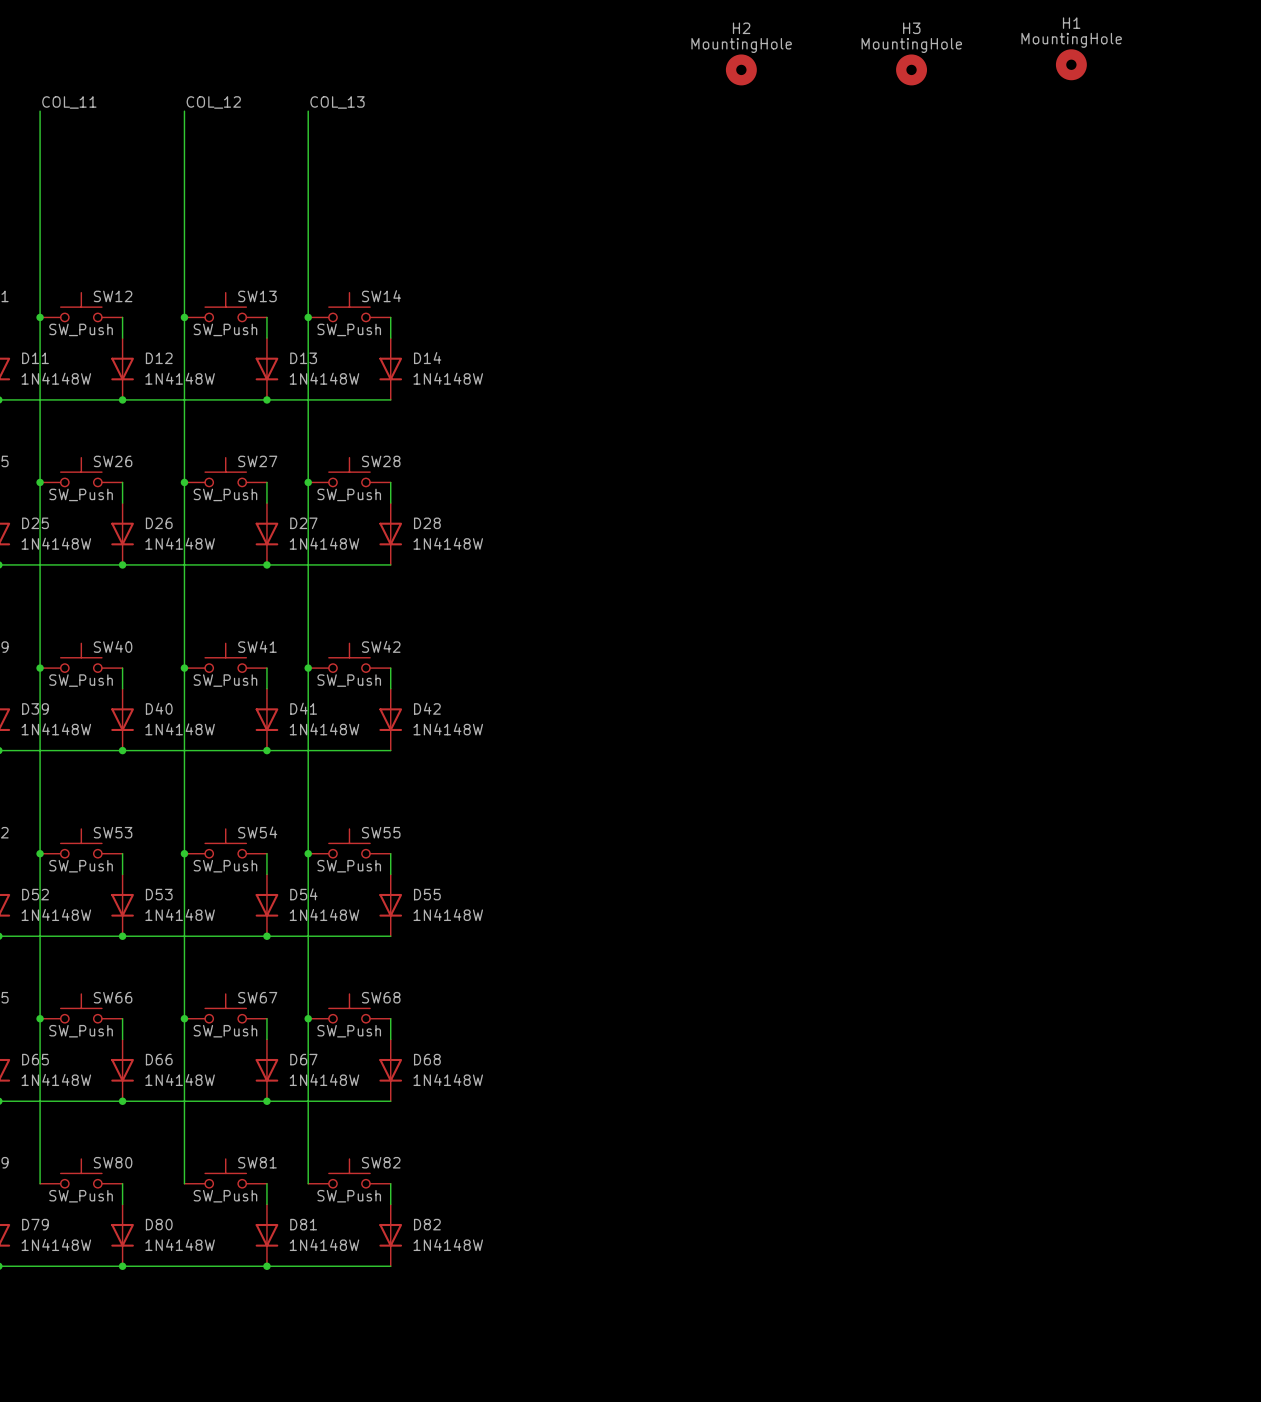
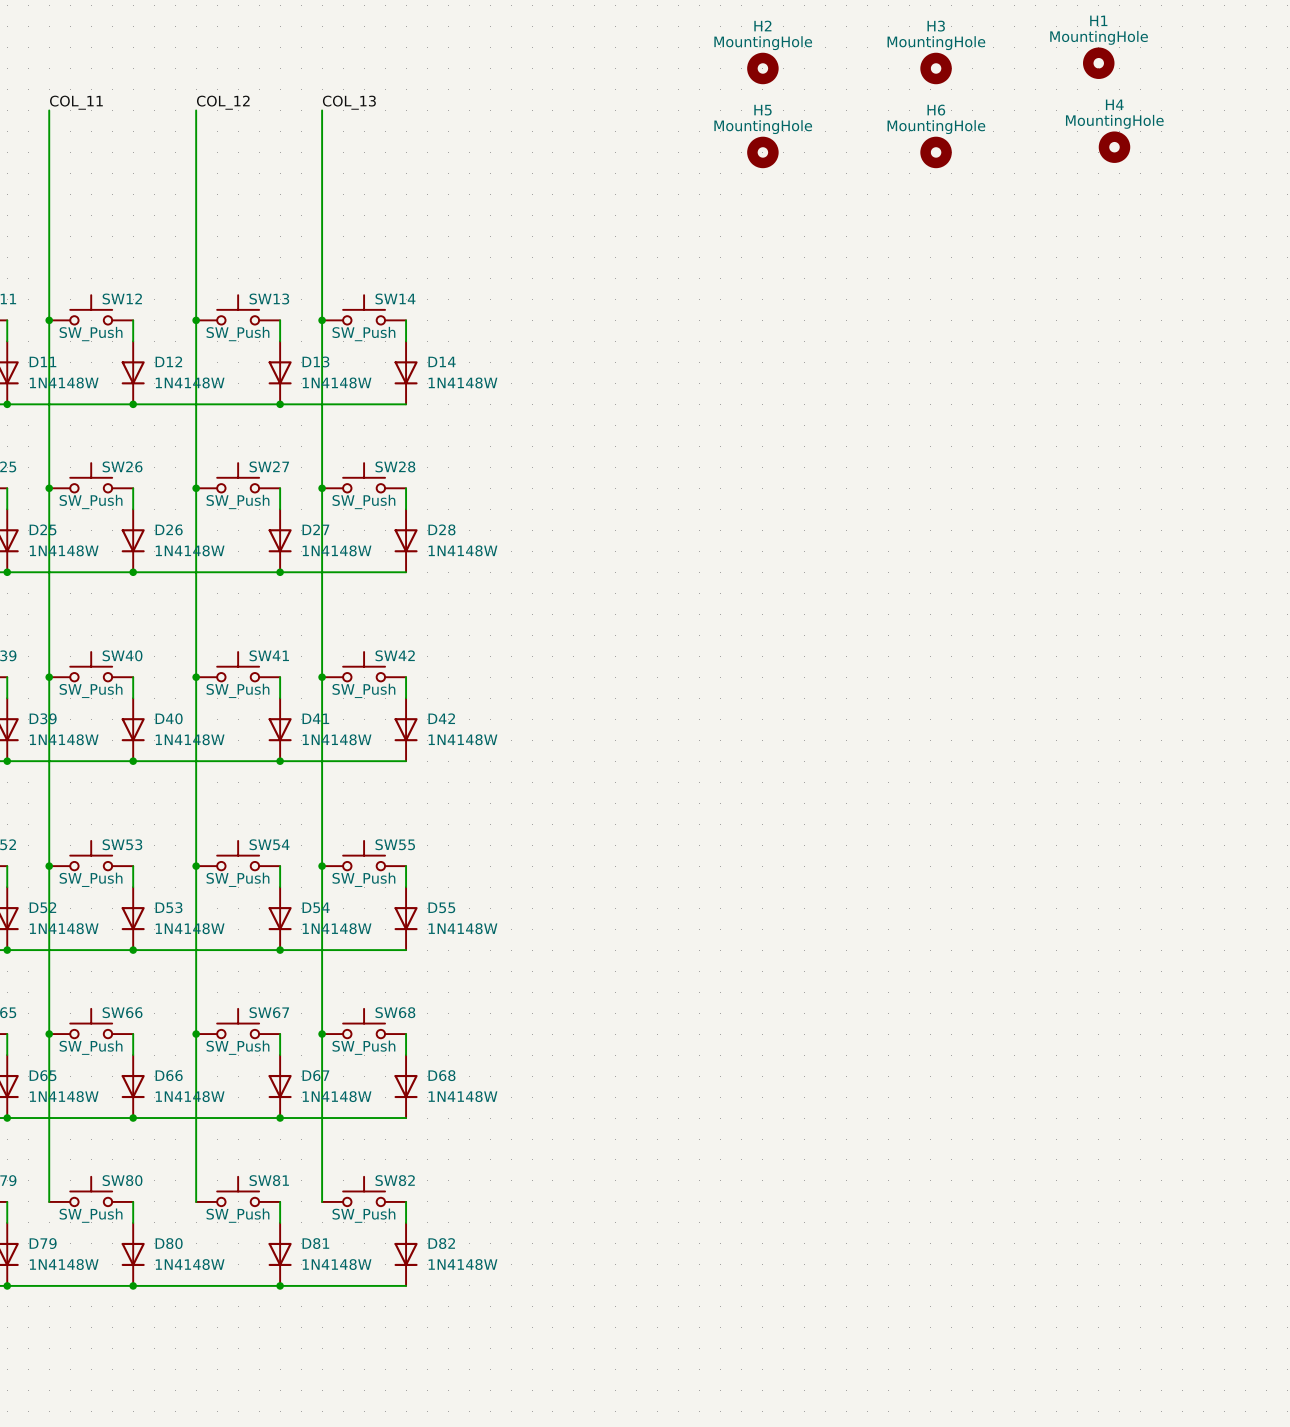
H4: none -> MountingHole (1114, 147)
H5: none -> MountingHole (762, 152)
H6: none -> MountingHole (936, 152)

